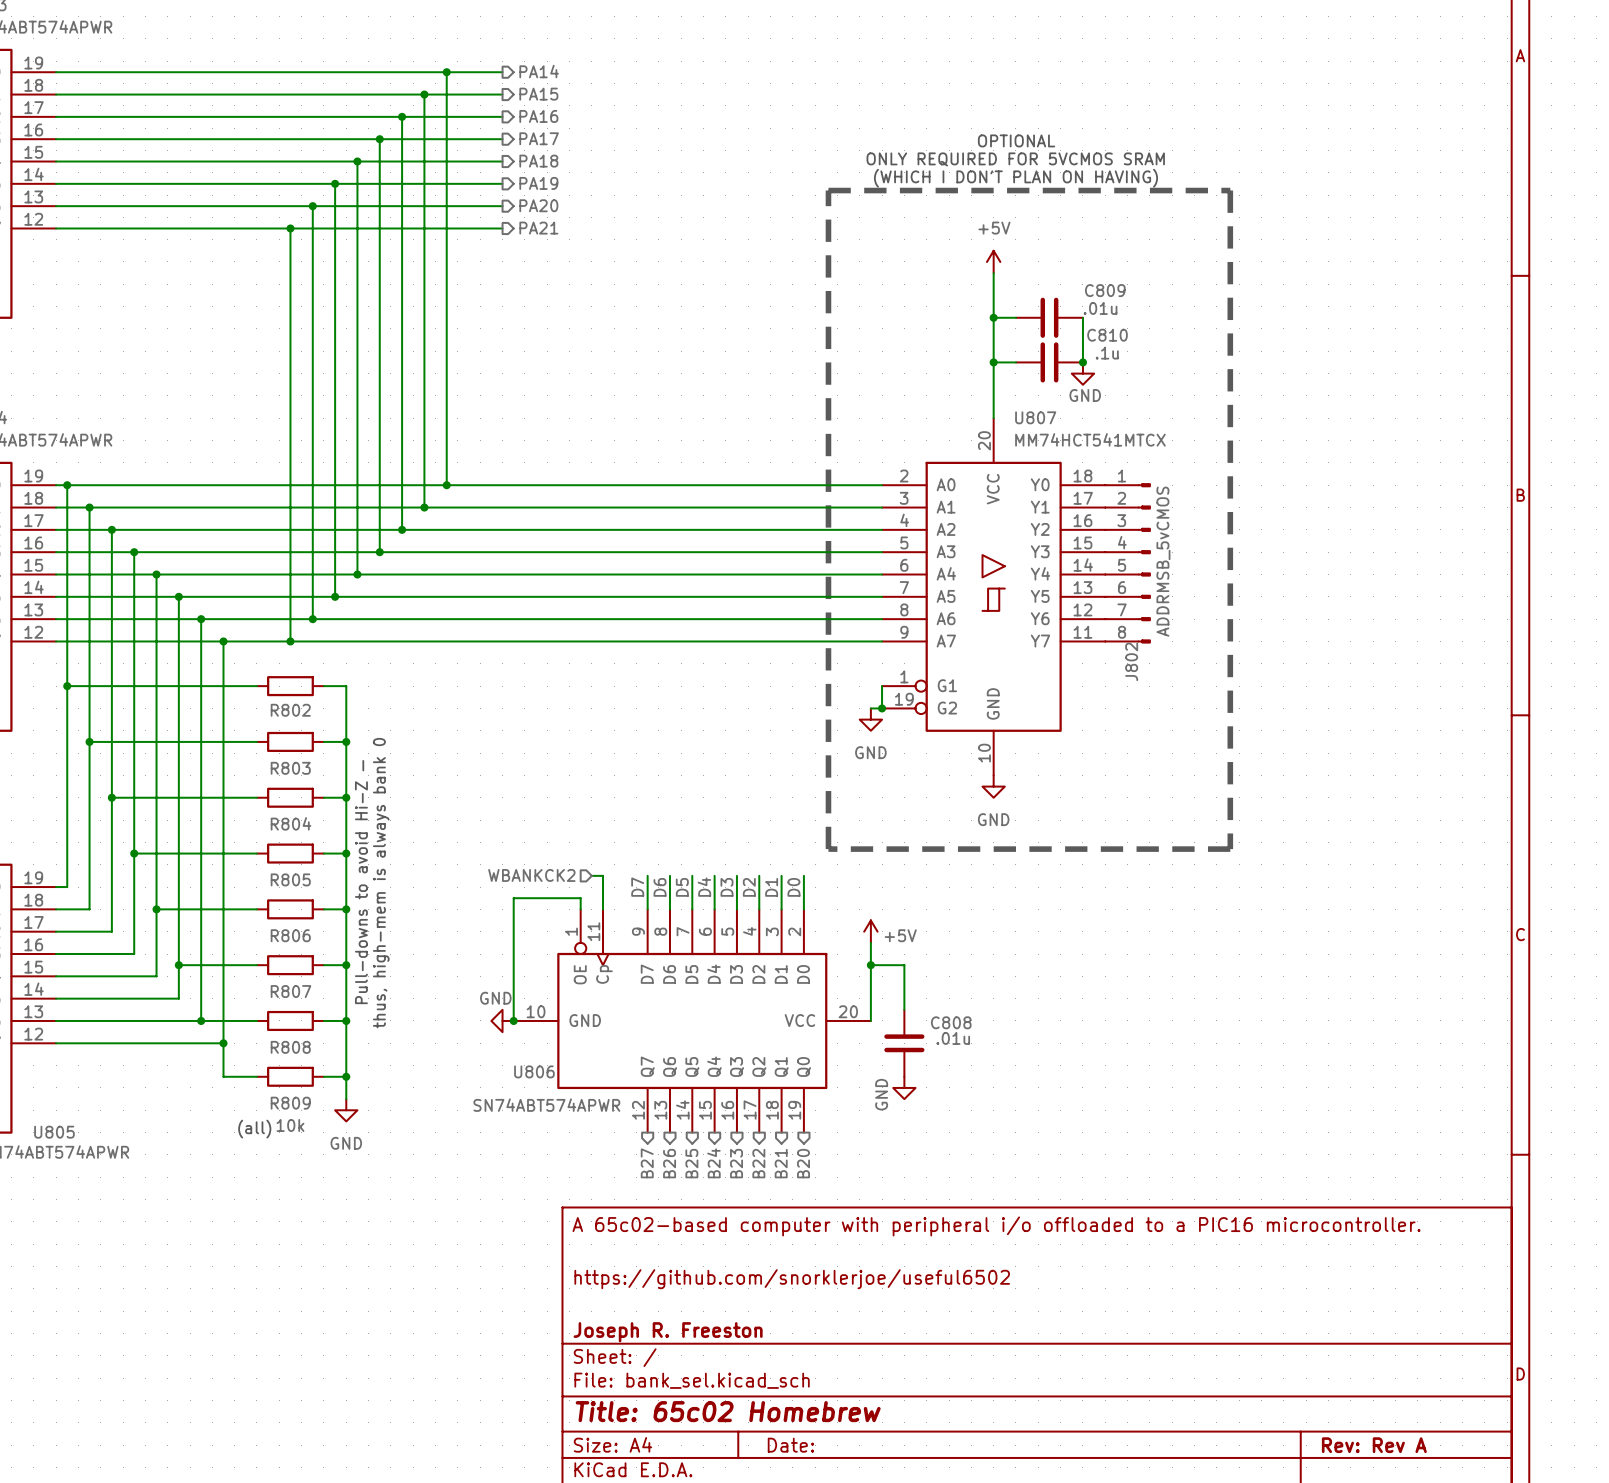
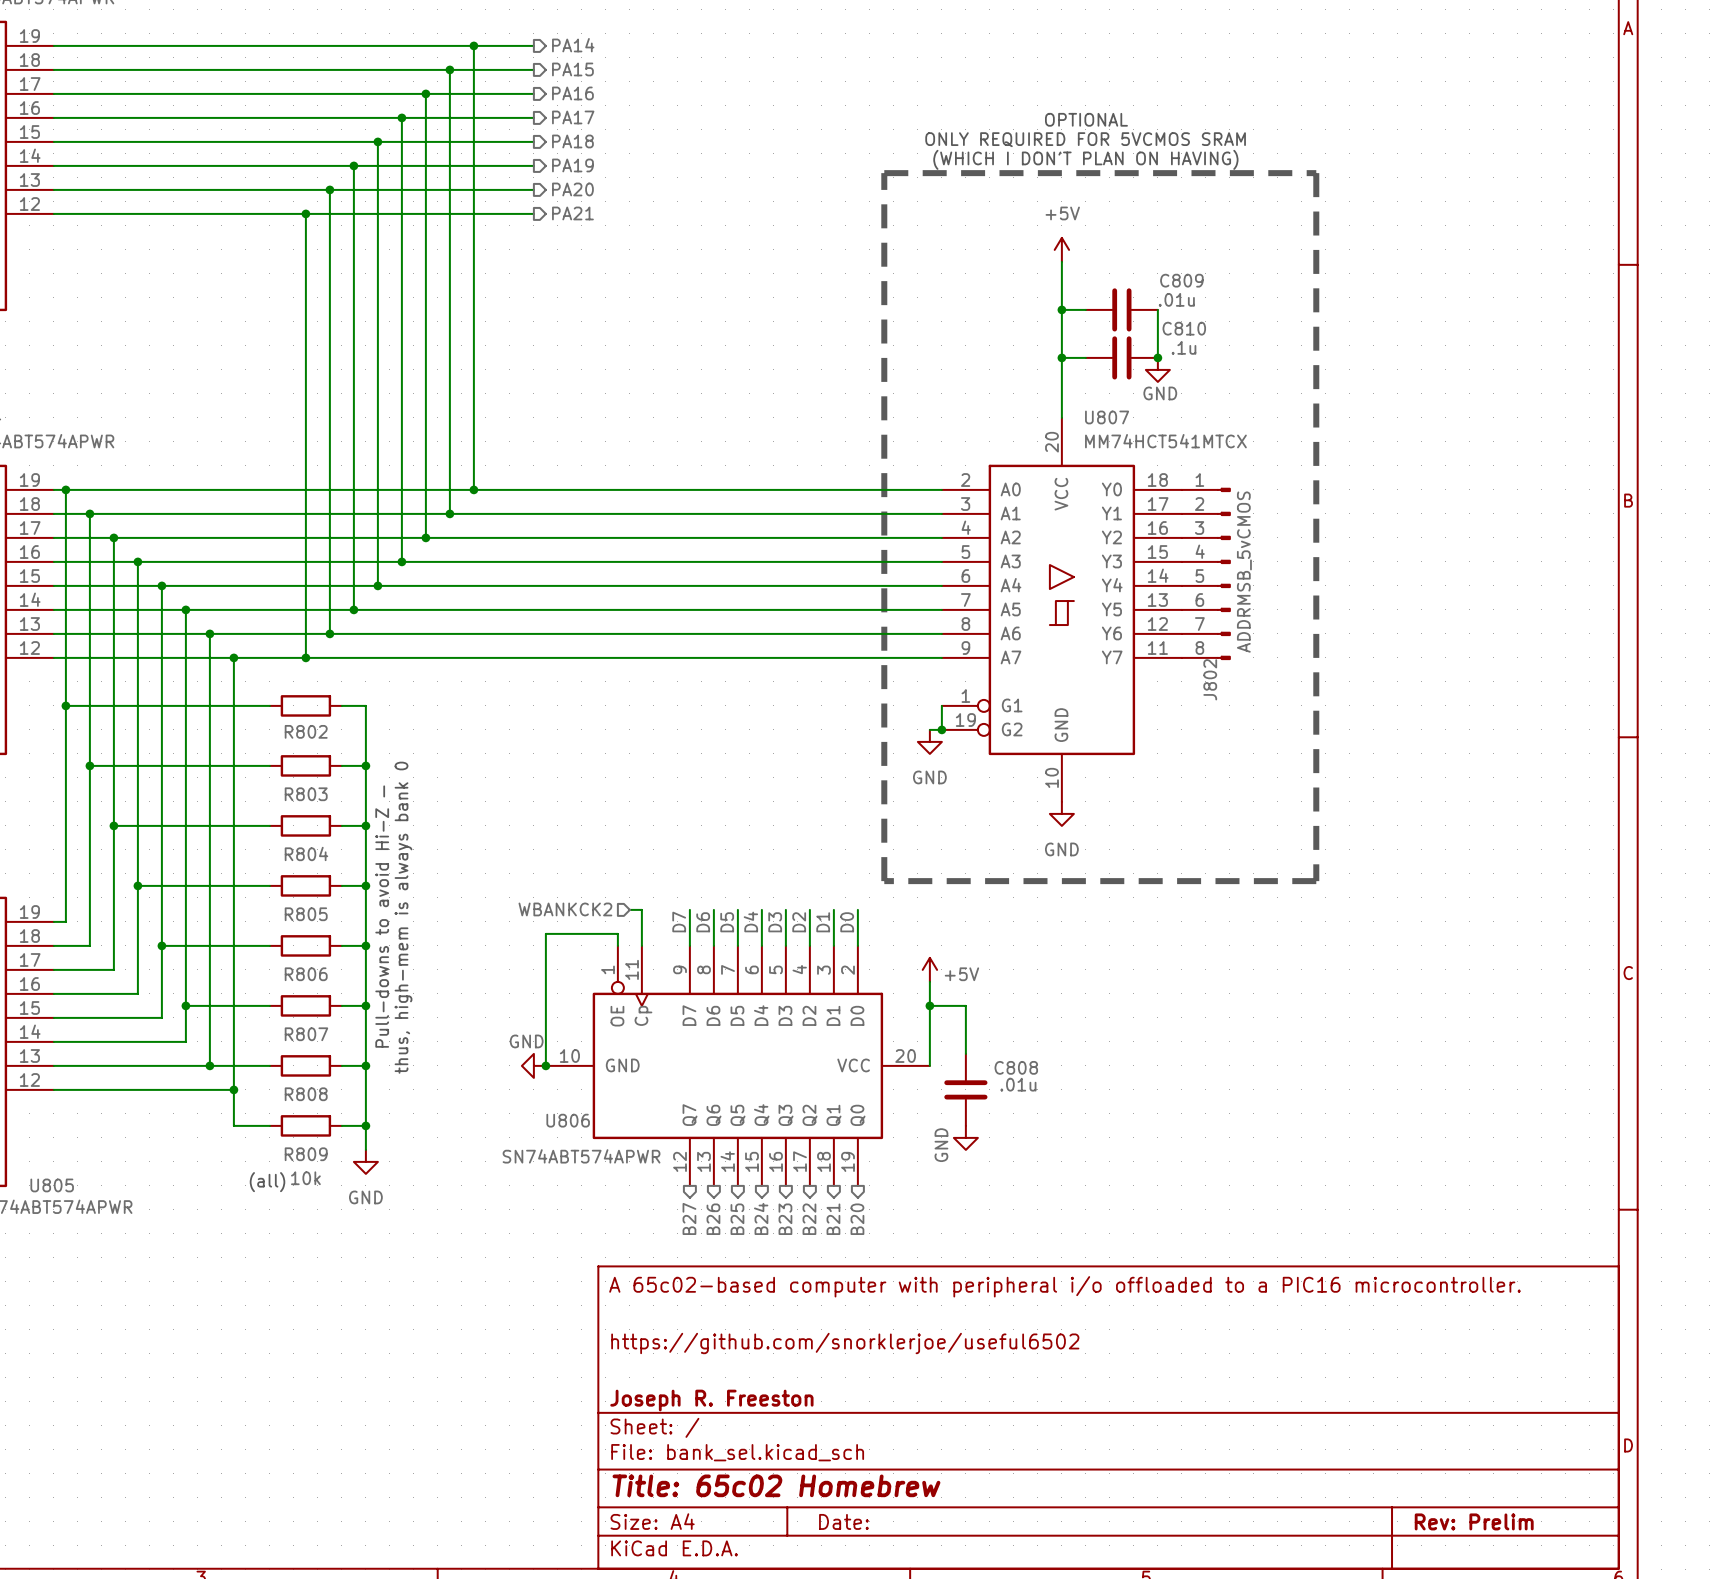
title block: Rev: Rev A (1374, 1445) -> Rev: Prelim (1474, 1521)

